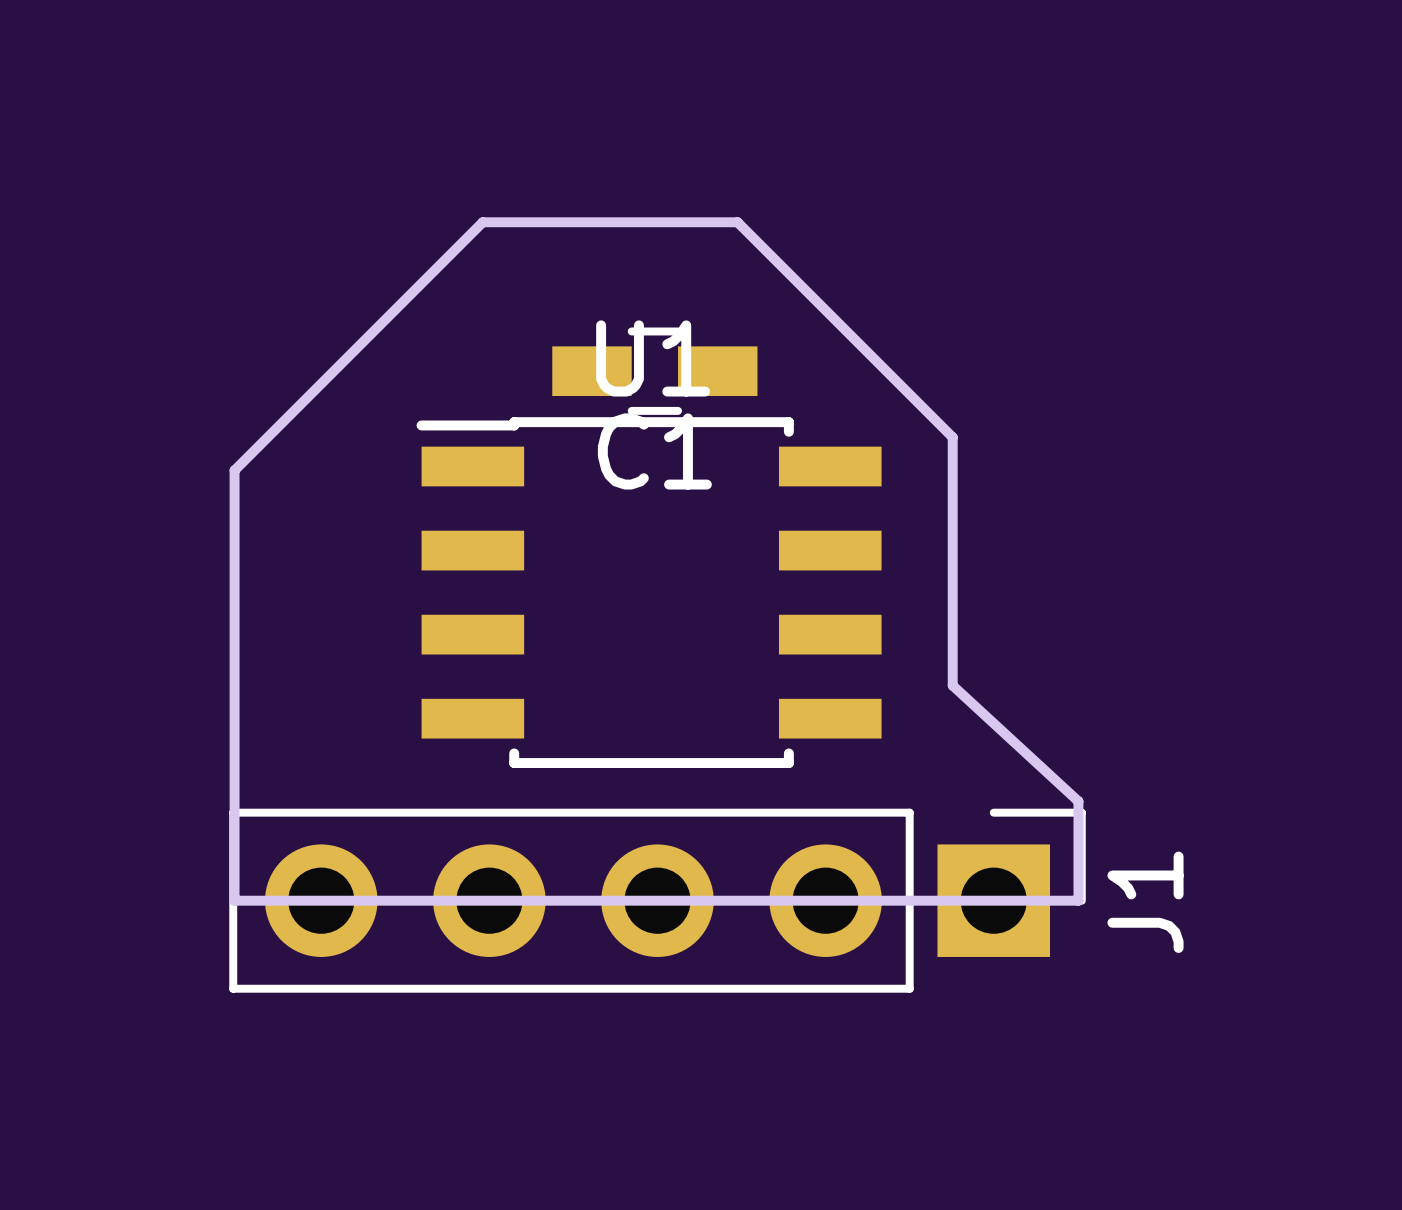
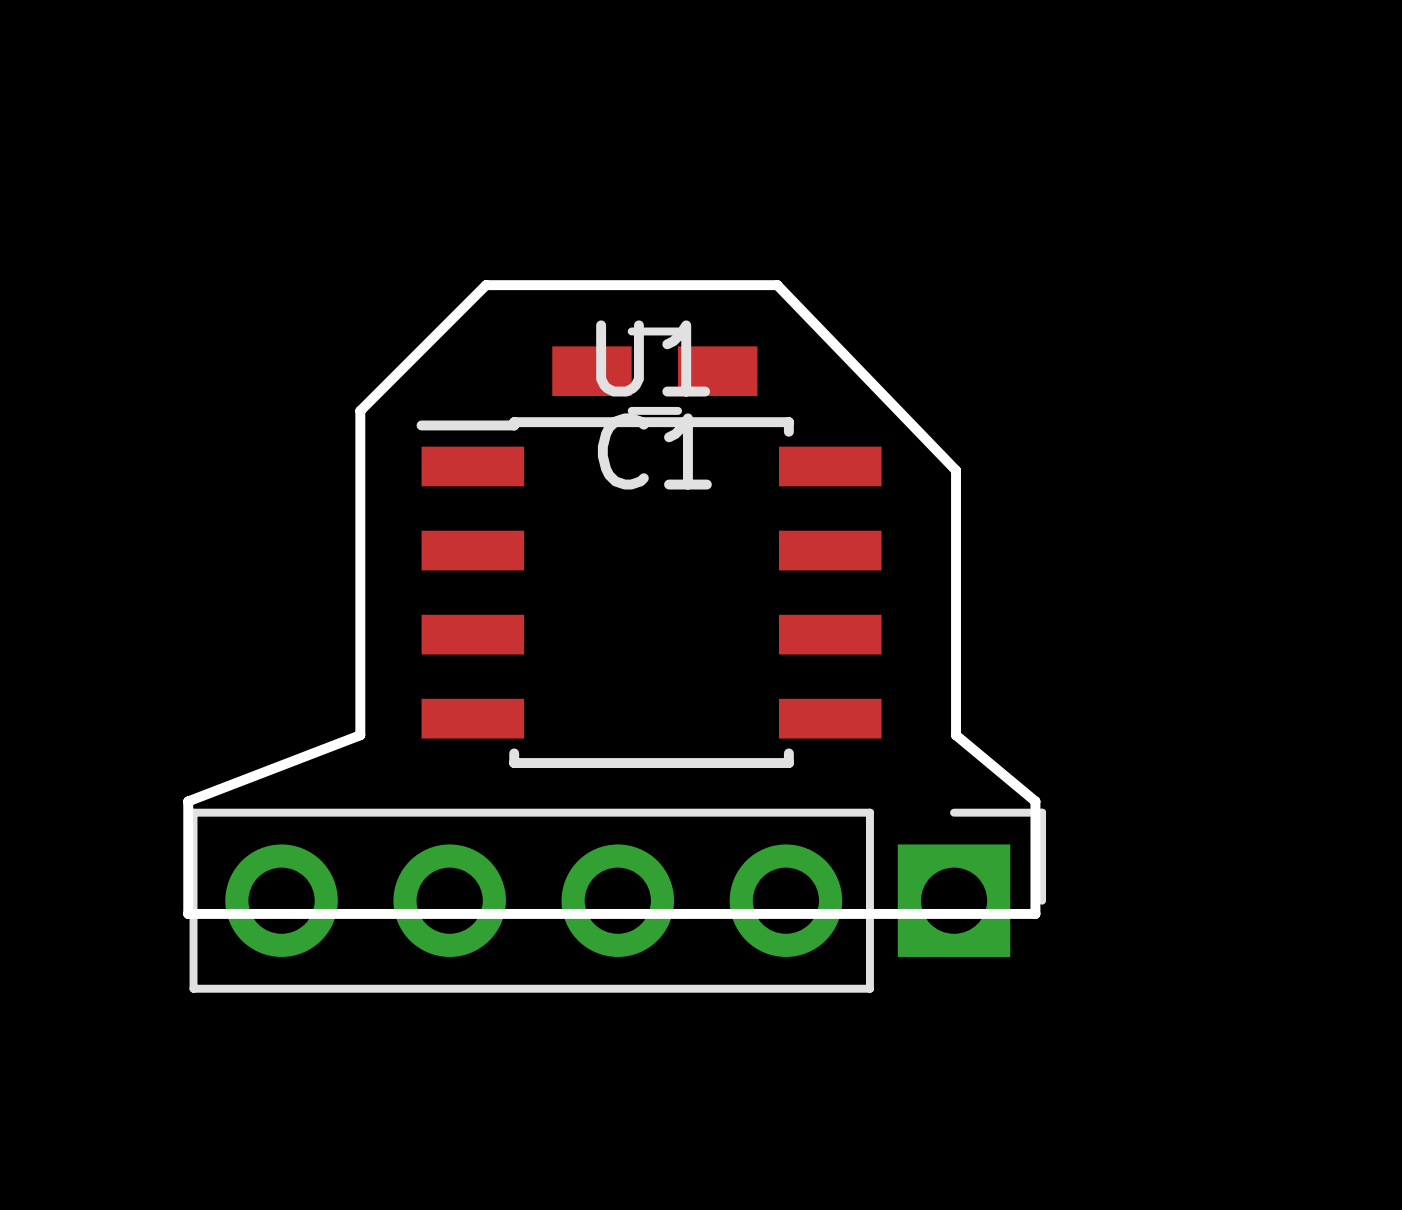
board edge: (482, 222) (234, 470) (234, 900) (1078, 900) (1078, 801) (952, 685) (952, 437) (737, 222) (482, 222) -> (486, 285) (360, 410) (360, 735) (188, 801) (188, 913) (1035, 913) (1035, 801) (956, 735) (956, 470) (777, 285) (486, 285)
J1 position: (657, 900) -> (617, 900)
J1 name: J1 (1145, 902) -> none

